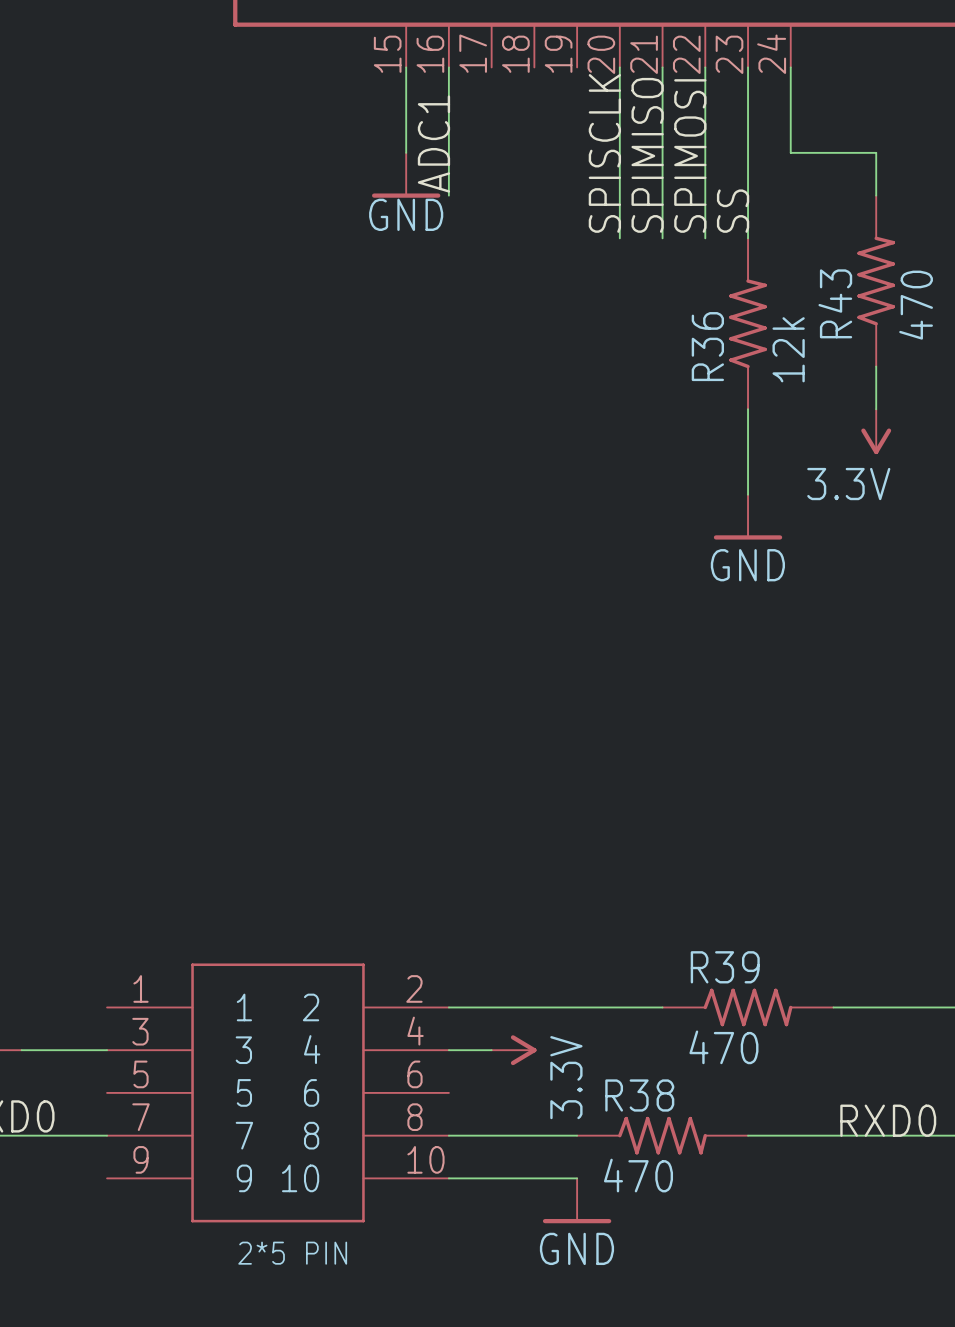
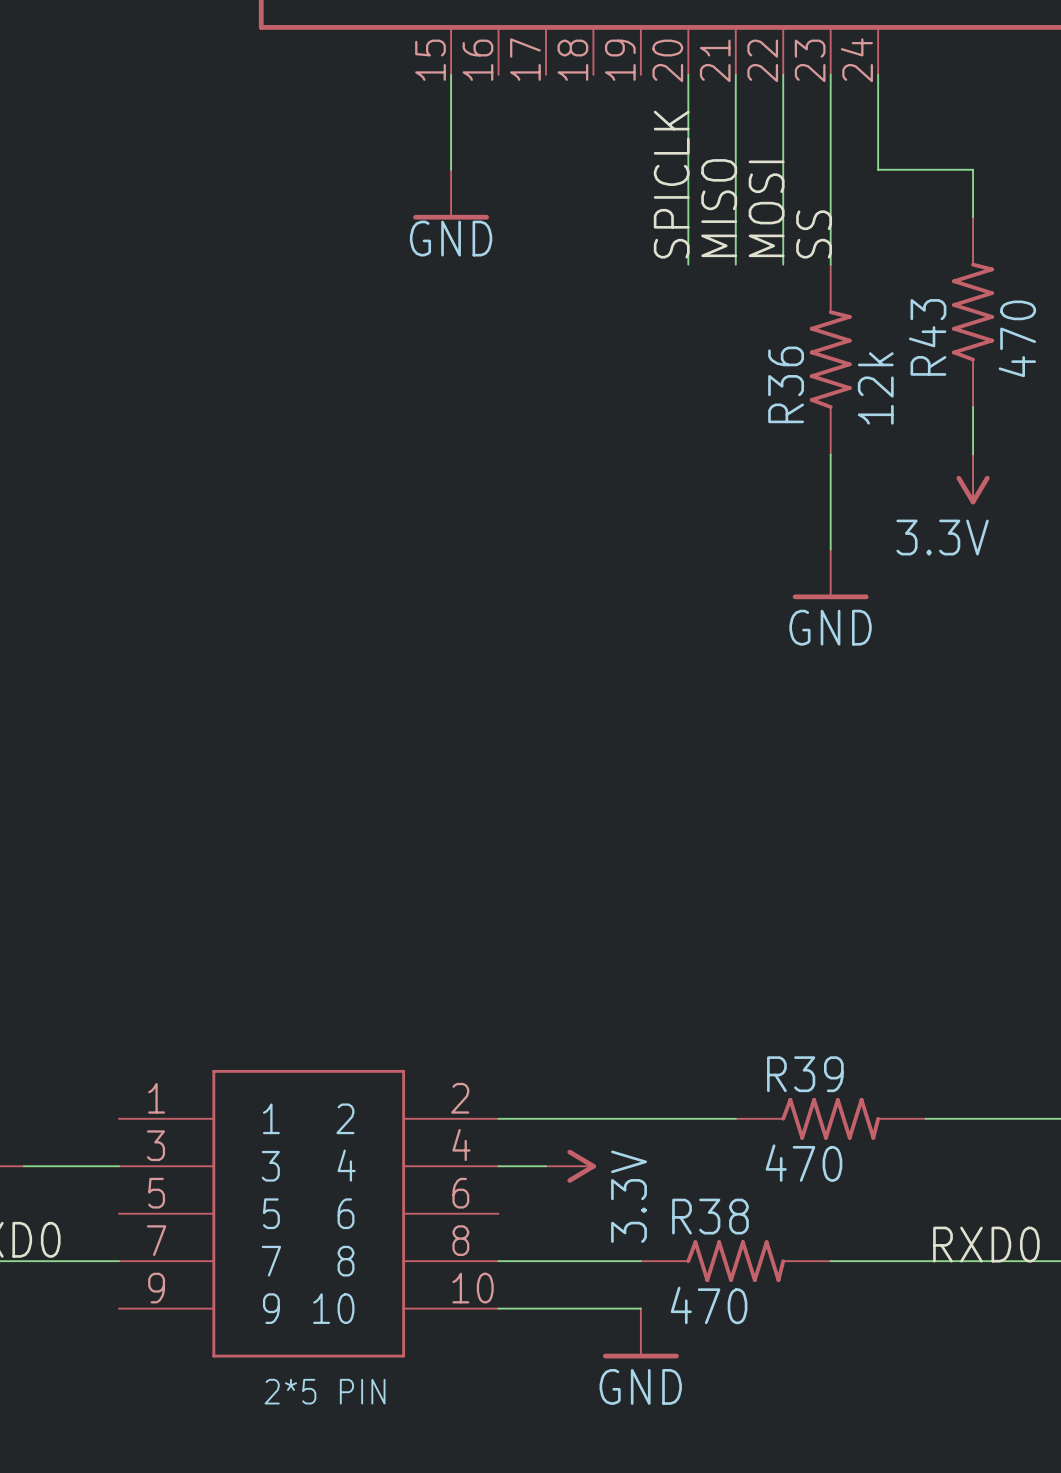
wire: (448, 67) (448, 195) -> none
label: ADC1 (433, 144) -> none
label: SPISCLK (604, 153) -> SPICLK (671, 184)
label: SPIMISO (647, 155) -> MISO (719, 208)
label: SPIMOSI (690, 156) -> MOSI (766, 208)

